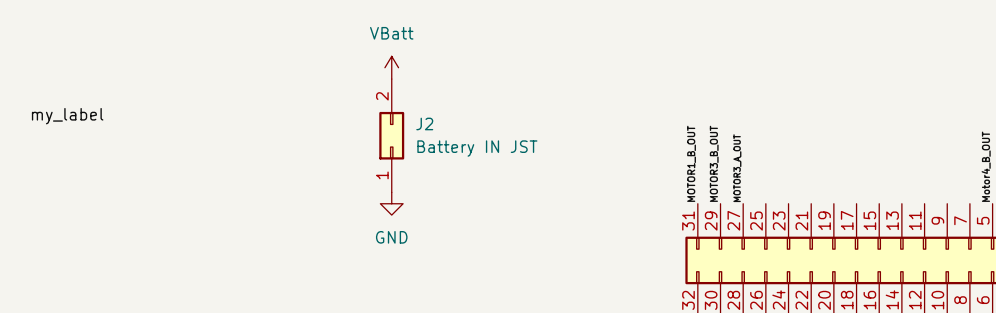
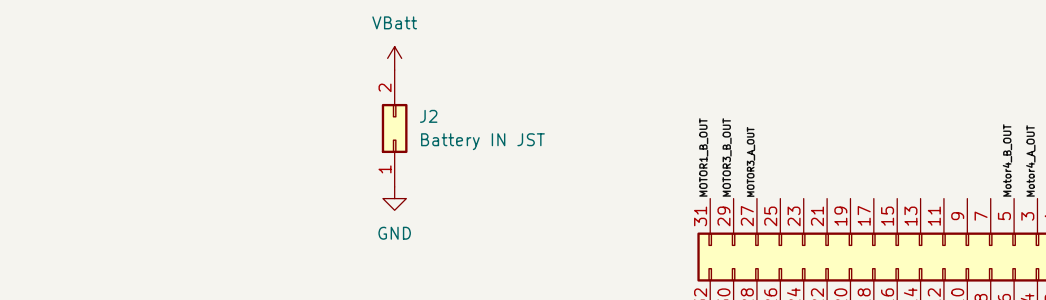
label: my_label (67, 116) -> none

